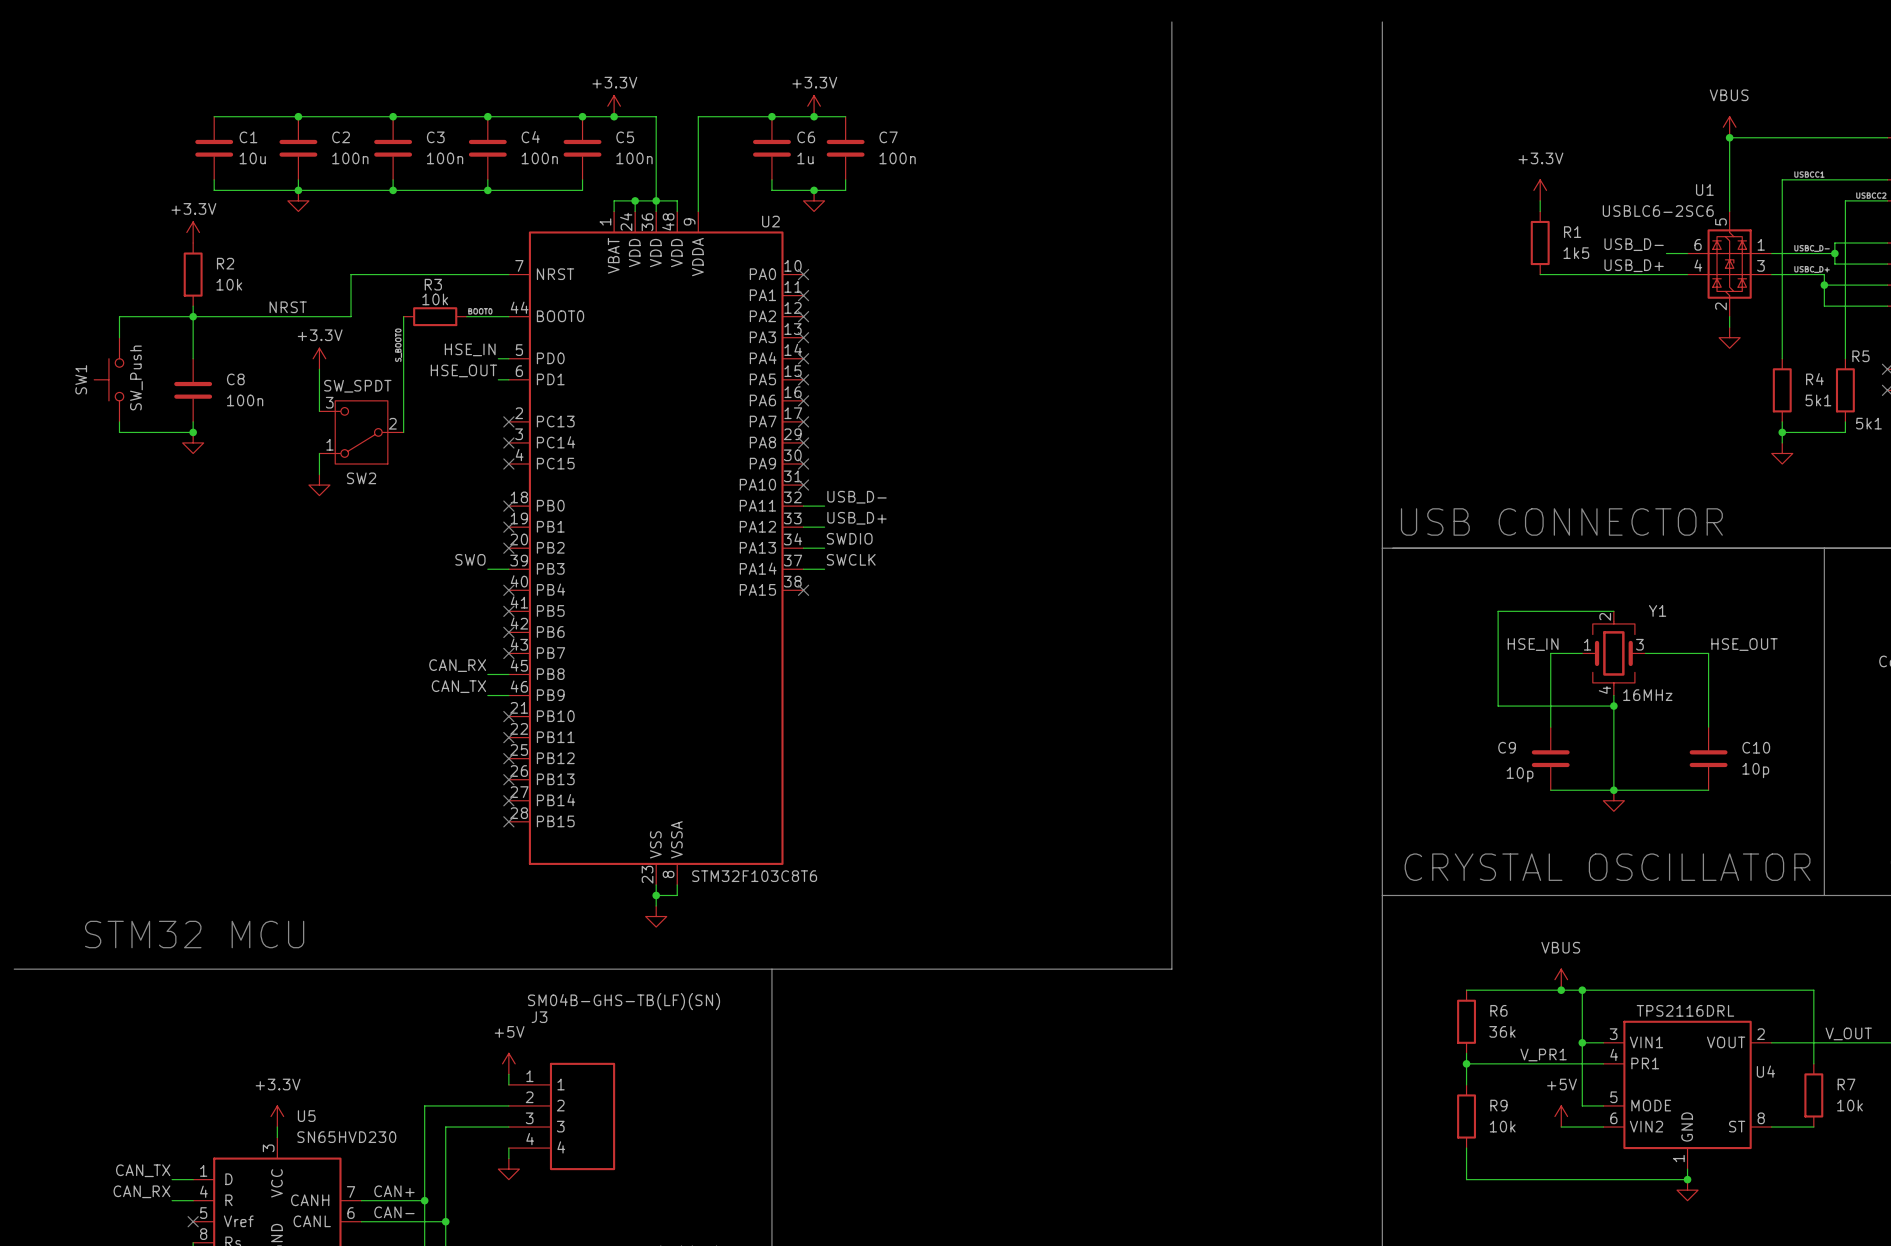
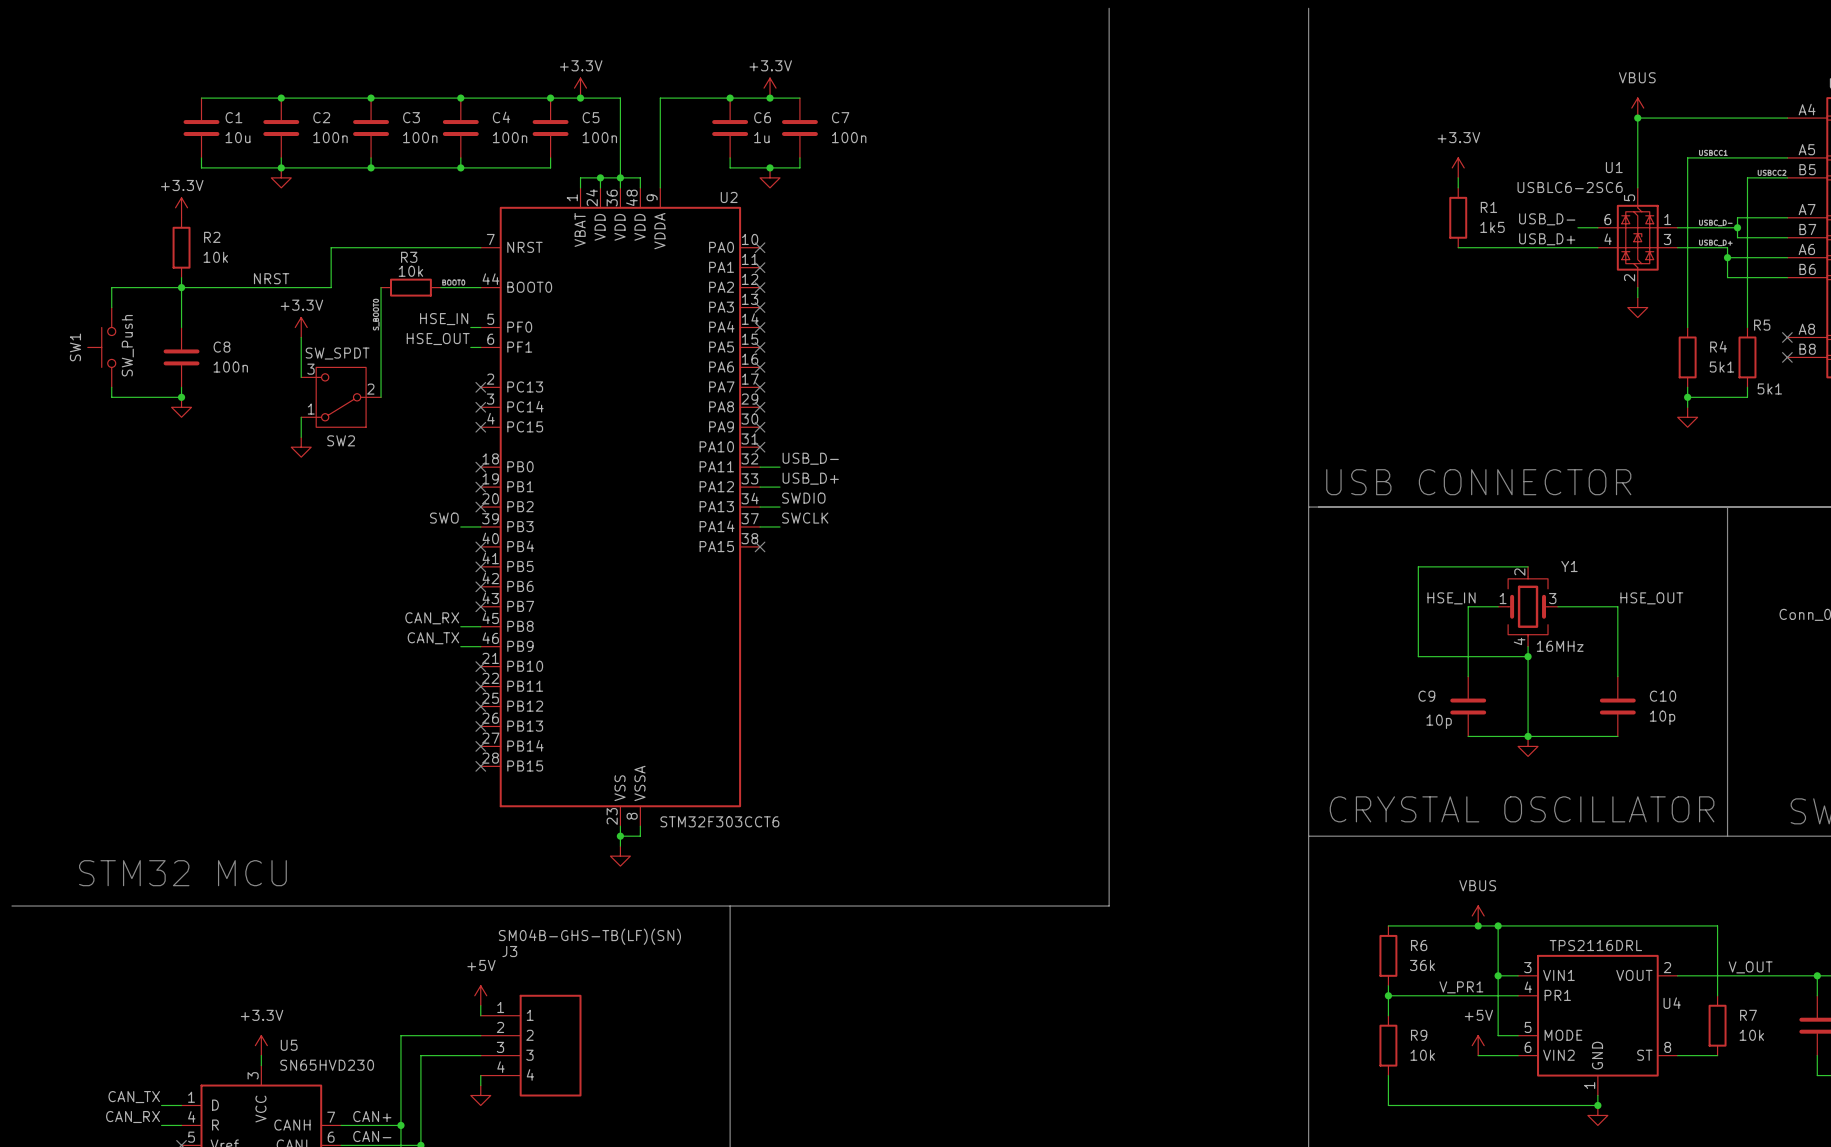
U2 pin name: PD0 (550, 358) -> PF0 (519, 327)
U2 pin name: PD1 (550, 379) -> PF1 (519, 347)
U2 value: STM32F103C8T6 (754, 876) -> STM32F303CCT6 (719, 821)

